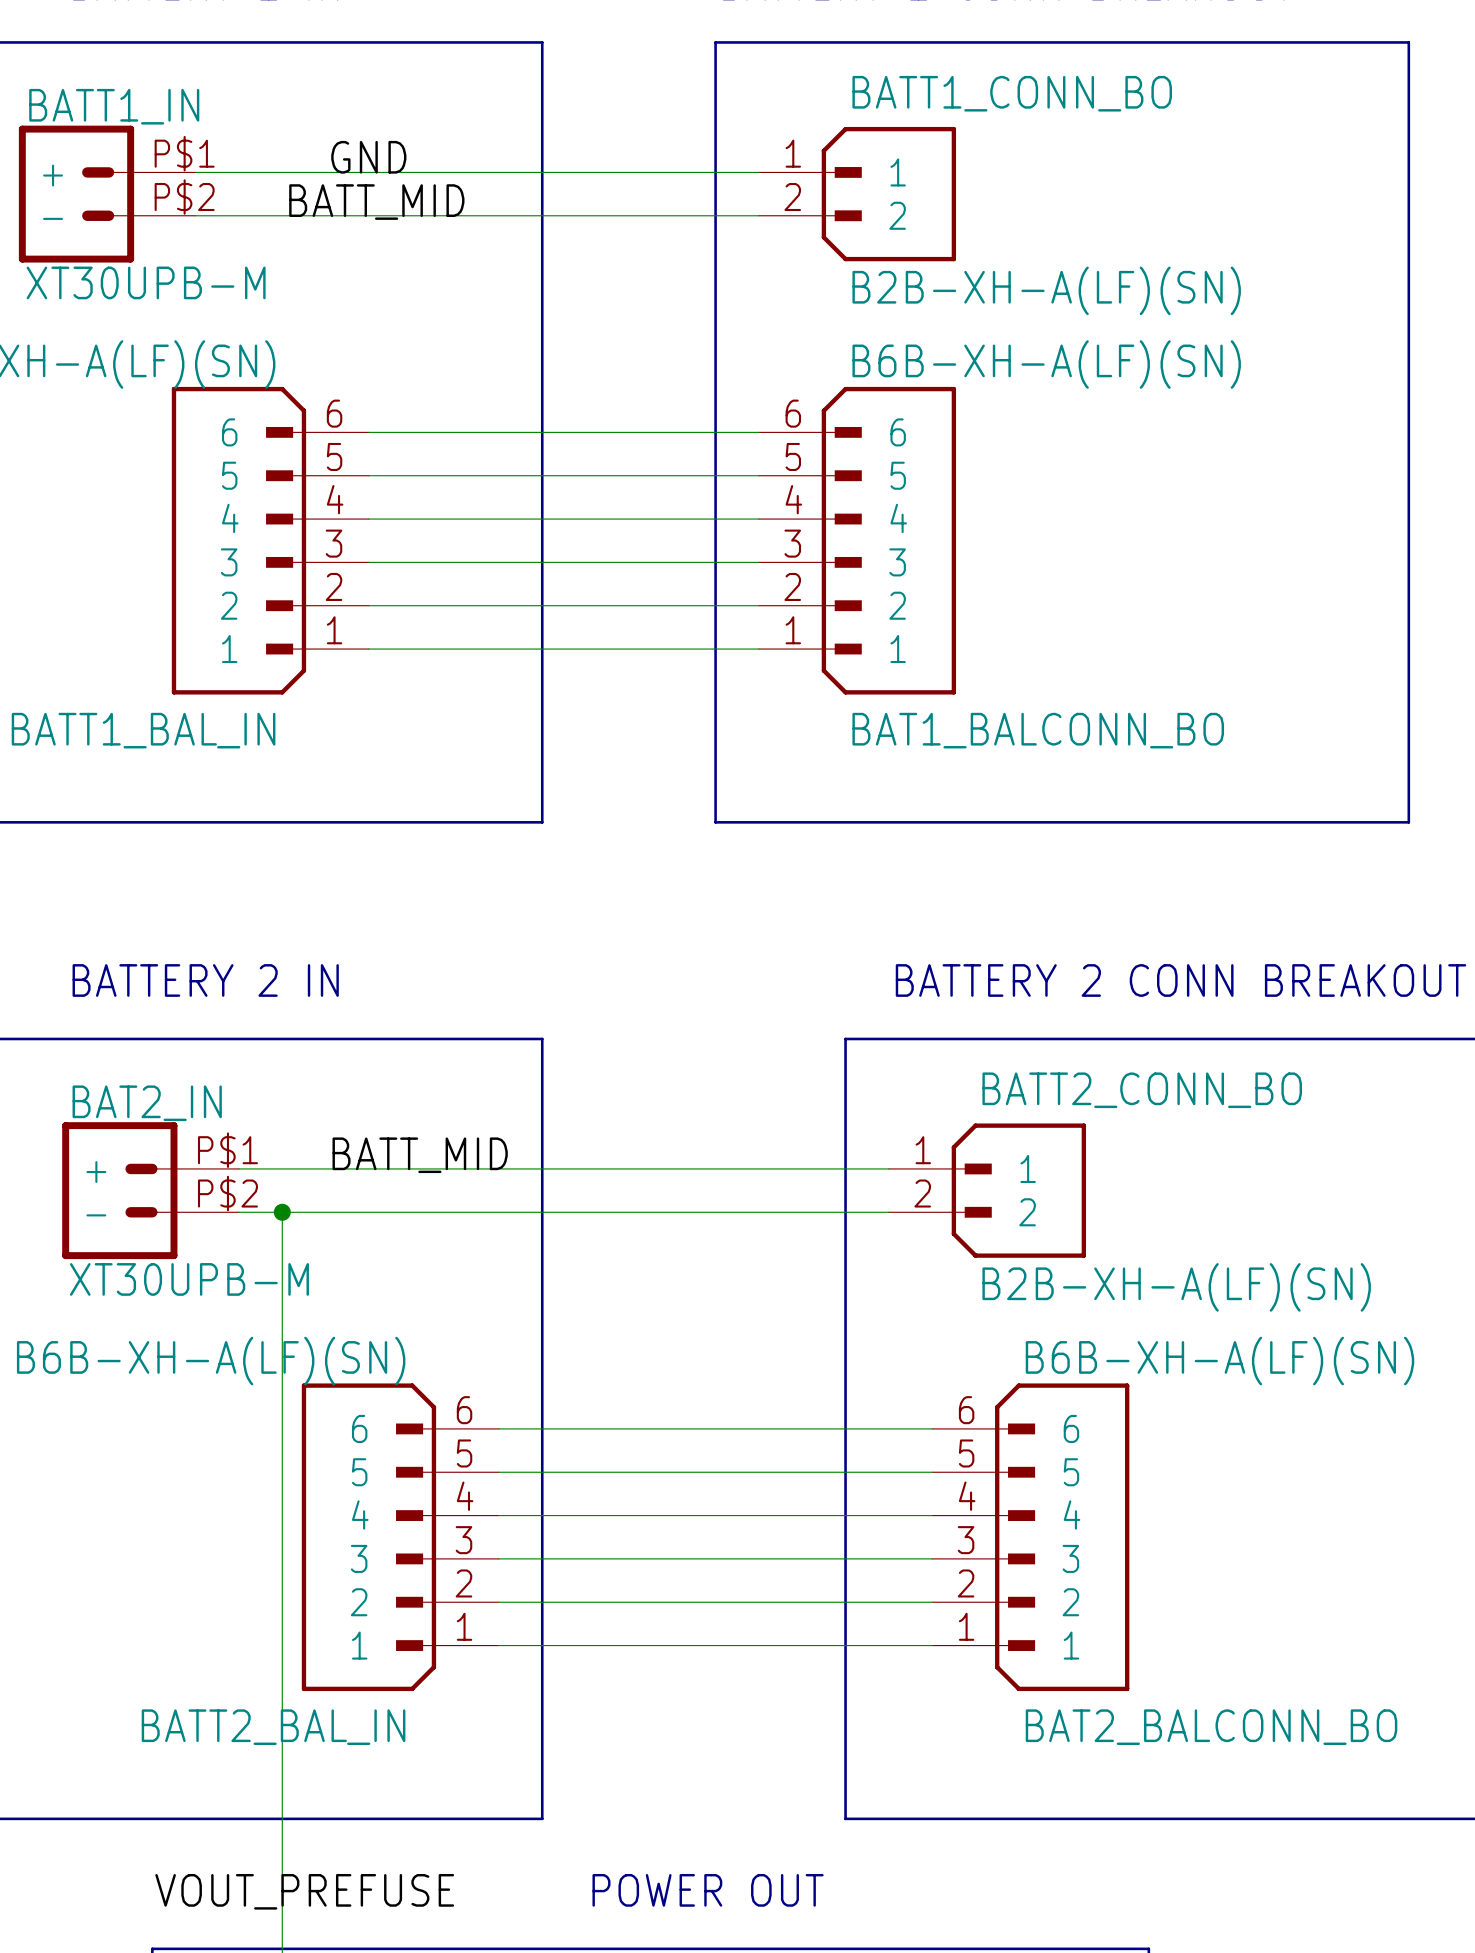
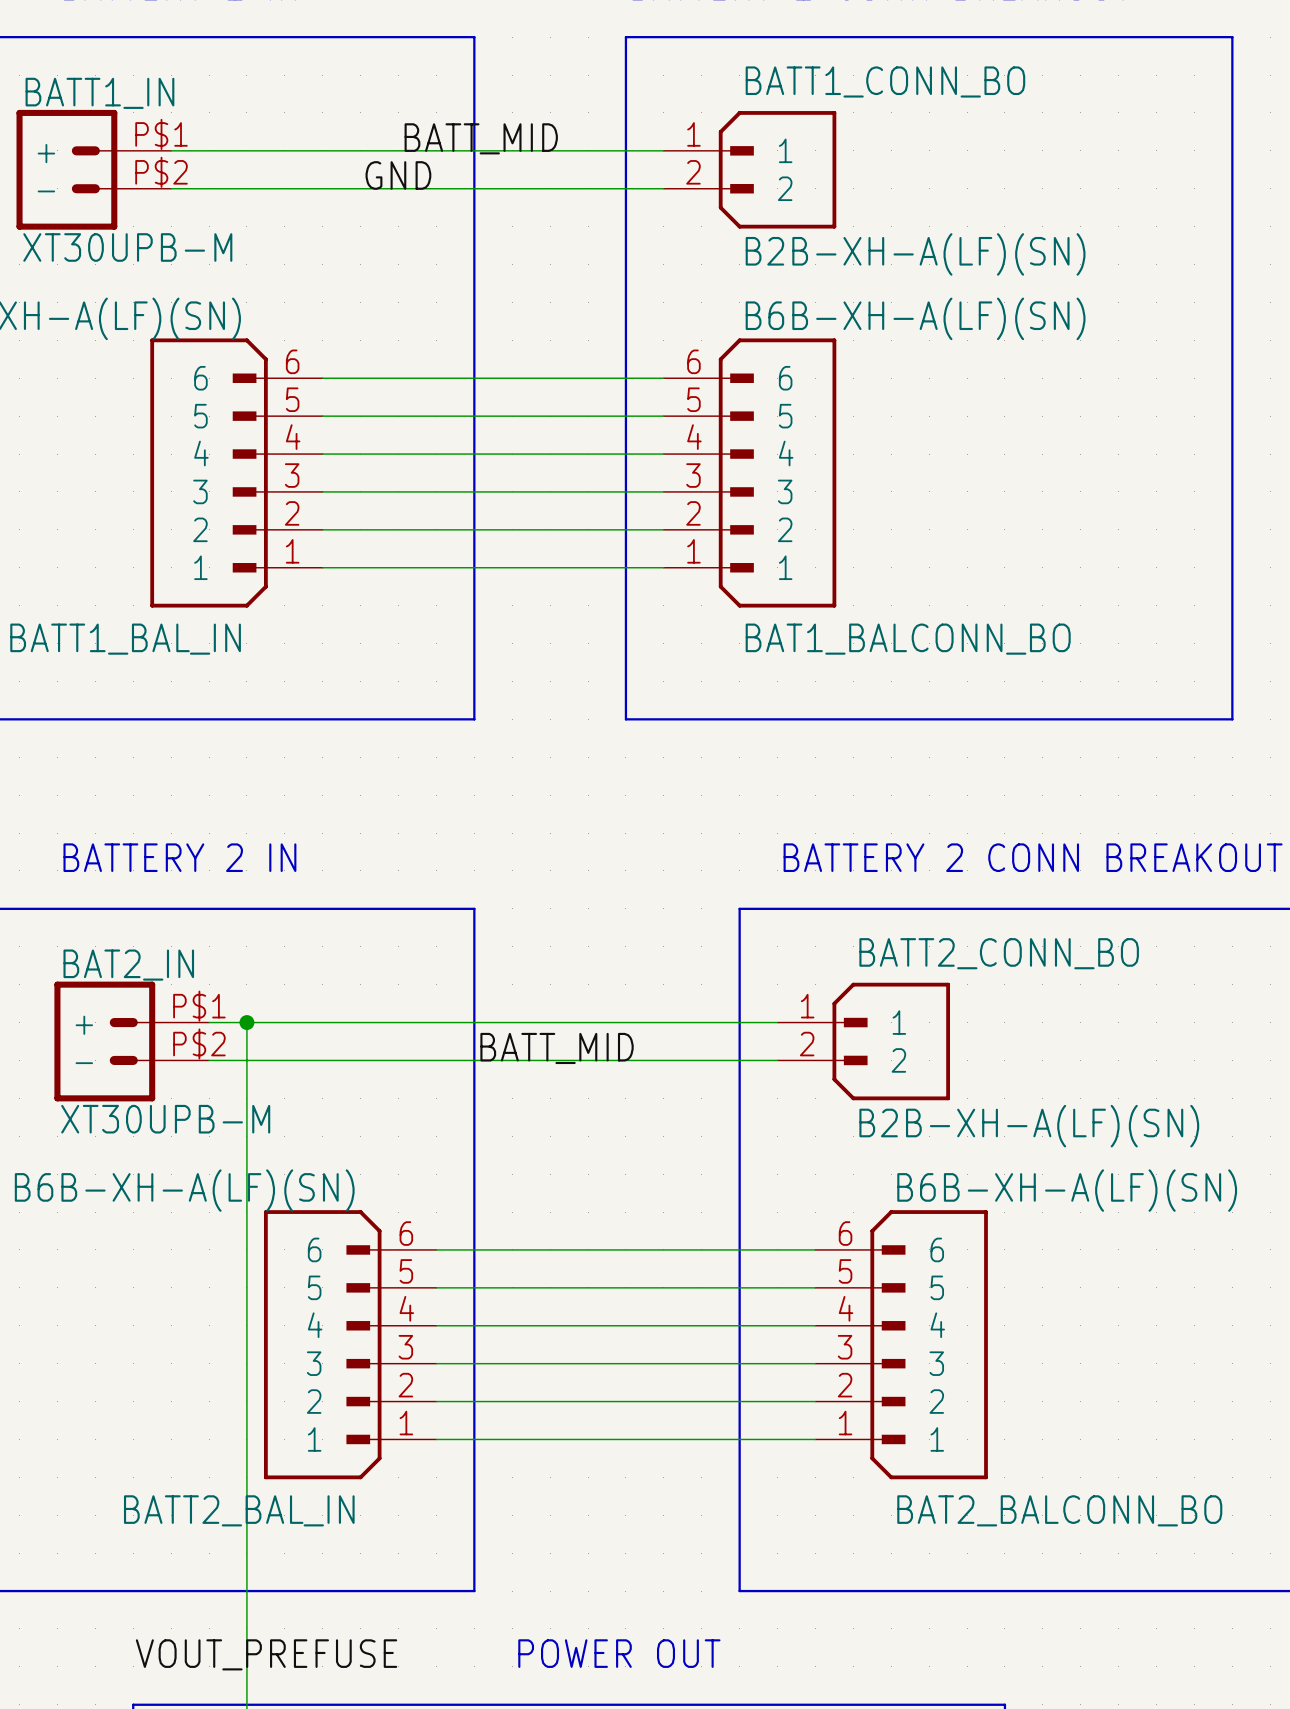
label position: GND (368, 157) -> GND (398, 175)
label position: BATT_MID (376, 202) -> BATT_MID (481, 138)
label position: BATT_MID (420, 1155) -> BATT_MID (557, 1048)
wire: none -> (246, 1022) (246, 1060)
junction position: (282, 1212) -> (246, 1022)

